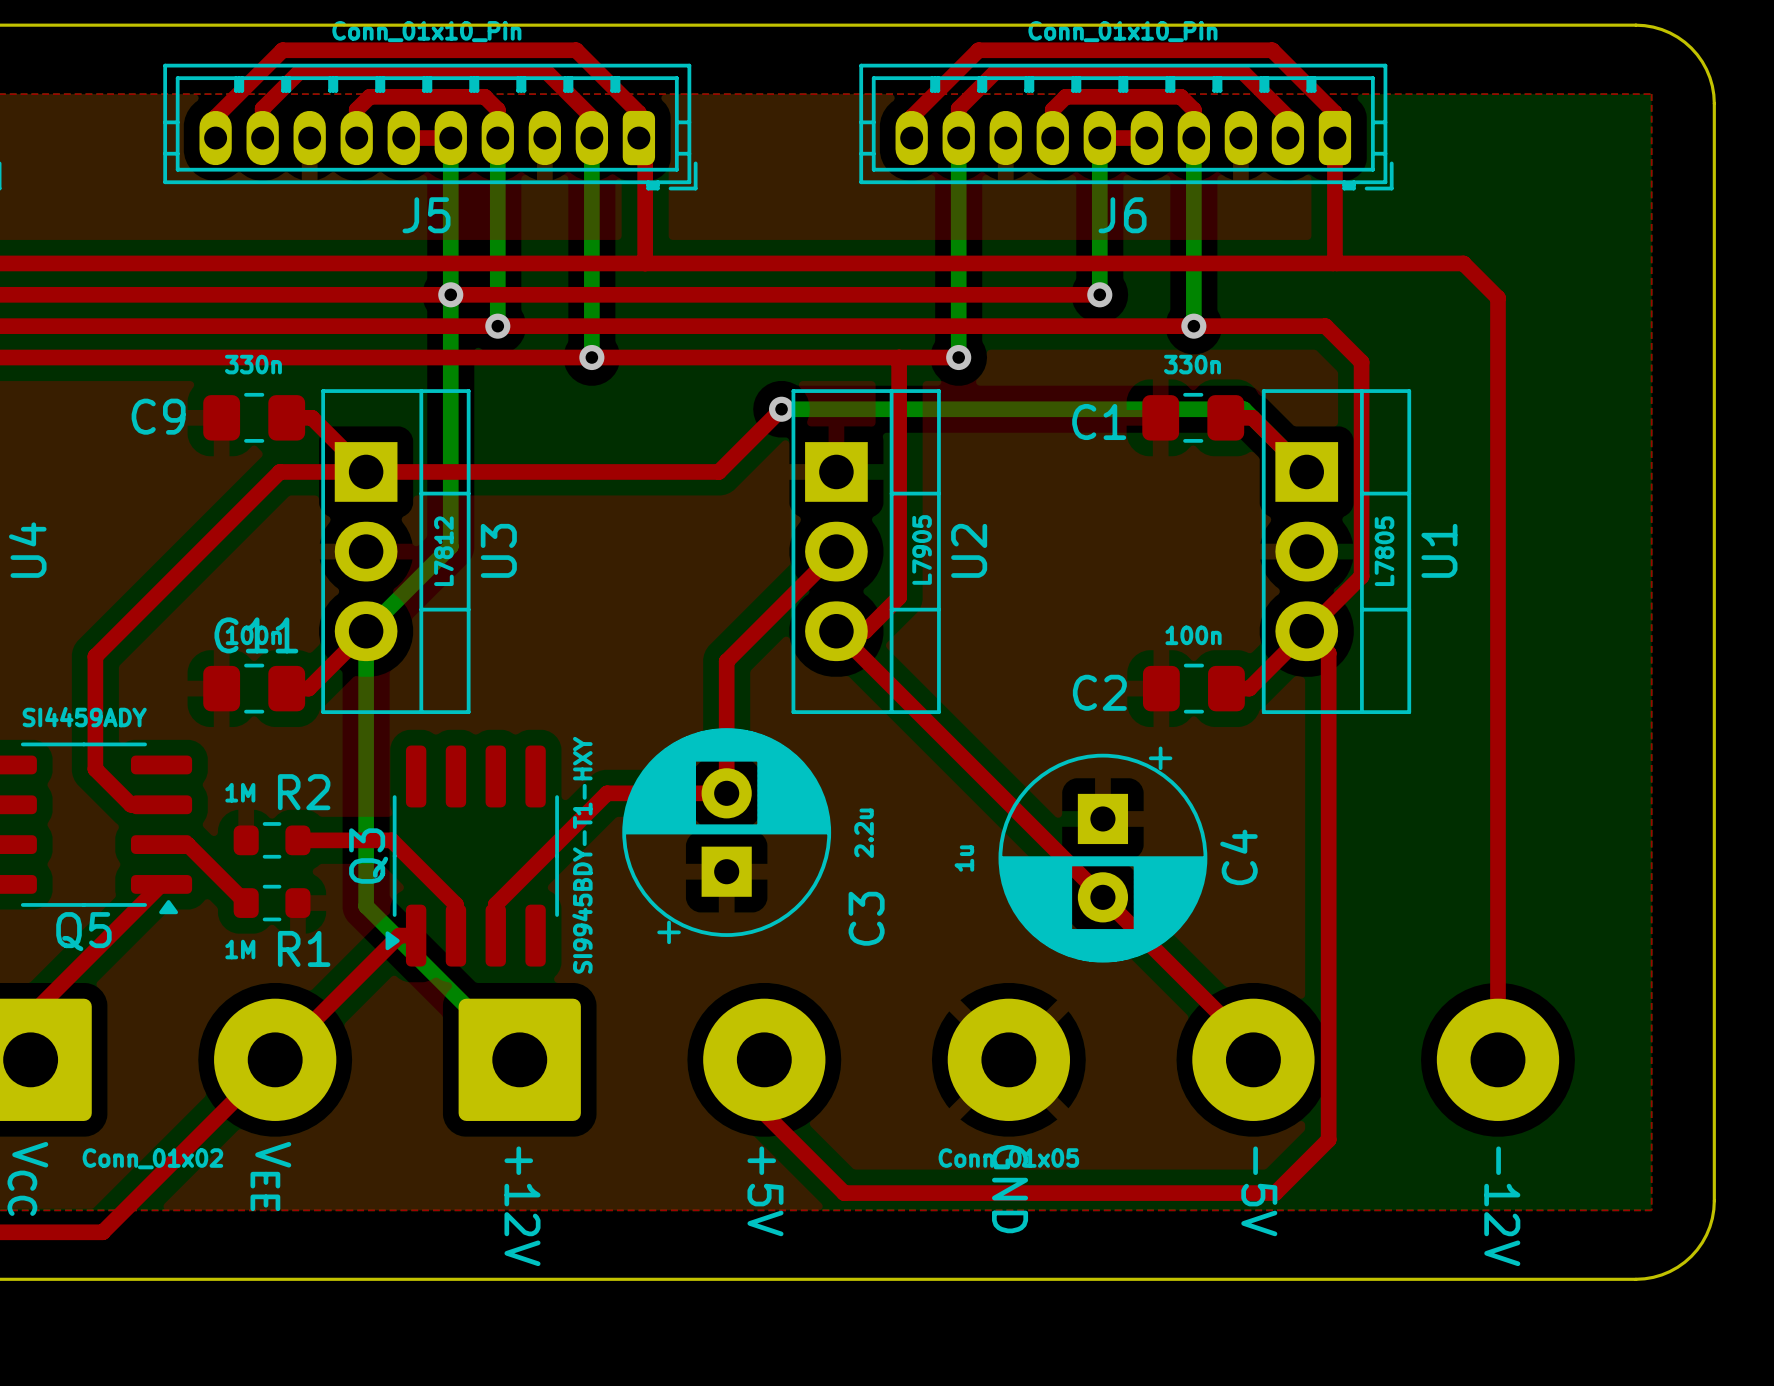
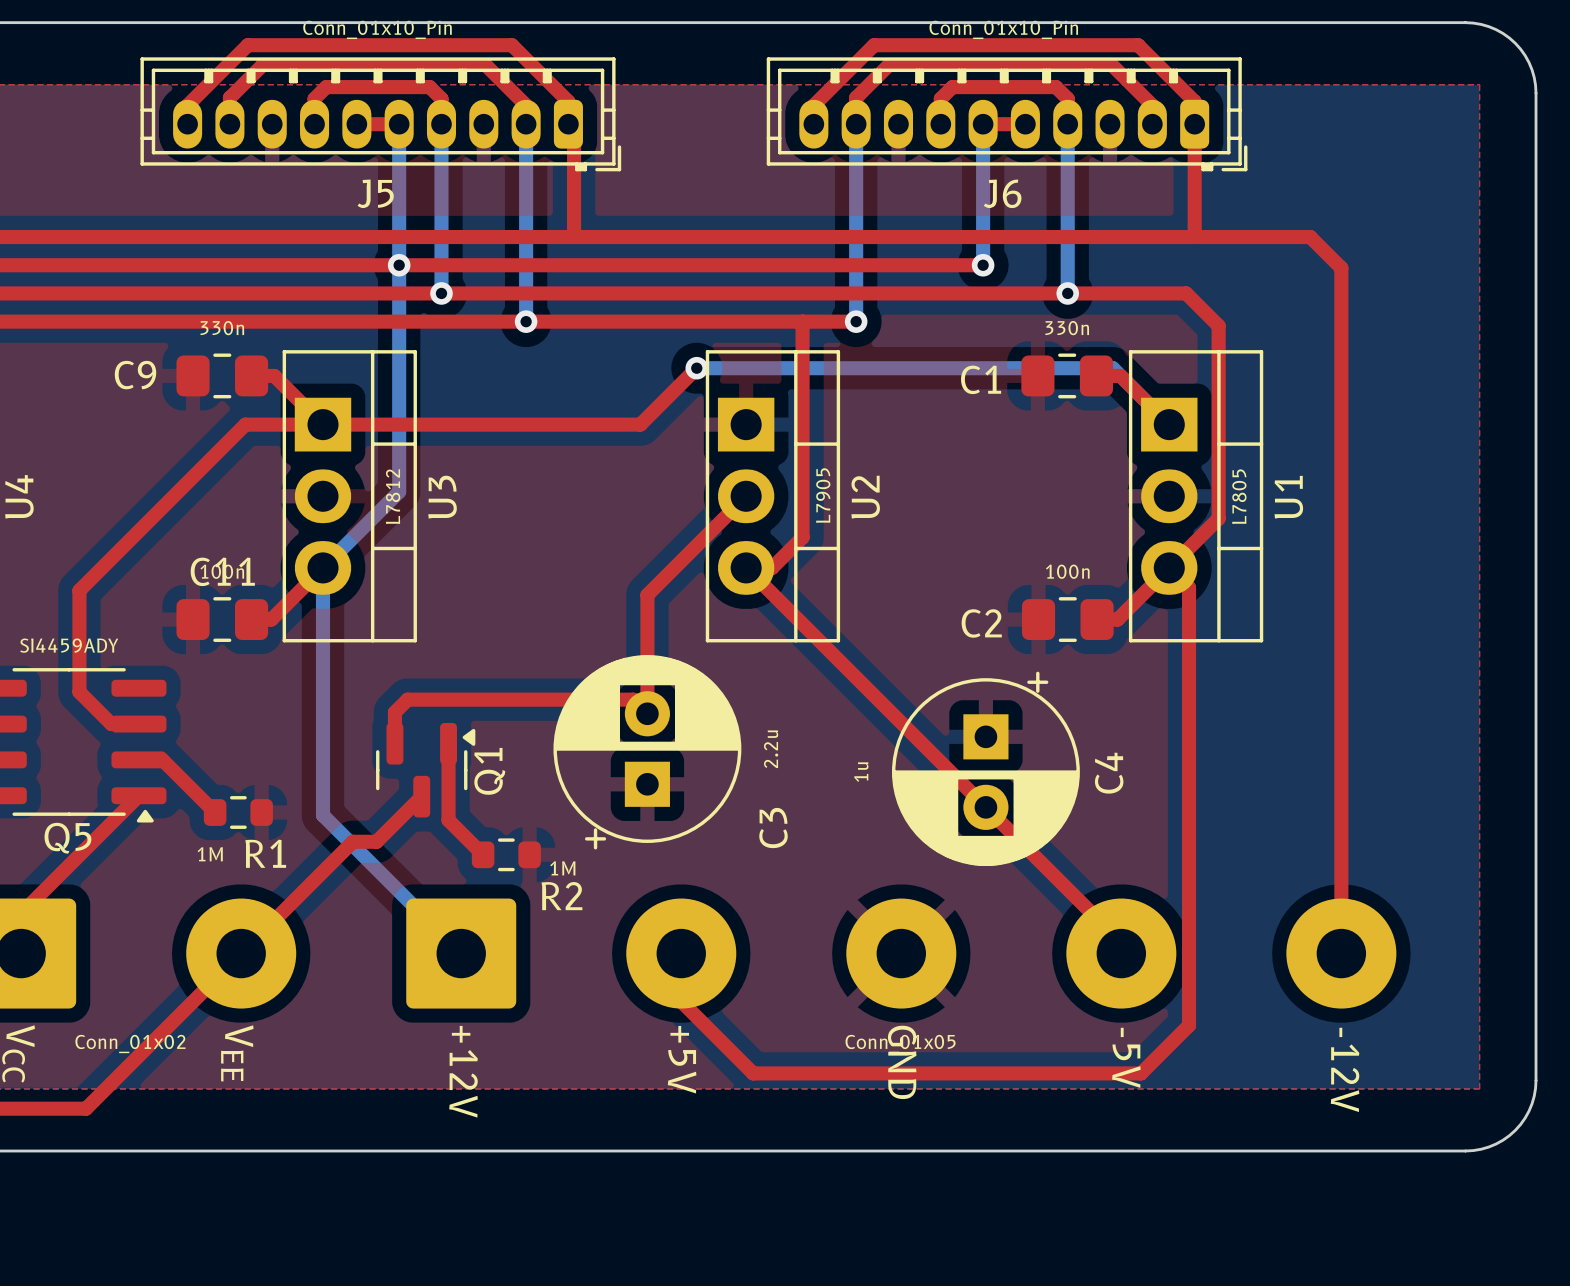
R2 value position: 1M (240, 792) -> 1M (562, 868)
R2 name position: R2 (304, 792) -> R2 (561, 896)
top track: (726, 793) (607, 793) (495, 904) (495, 935) -> (647, 713) (633, 699) (407, 699) (394, 712) (394, 743)
top track: none -> (448, 743) (448, 820) (483, 854)
R2 position: (272, 840) -> (506, 854)
top track: (297, 840) (391, 840) (455, 904) (455, 935) -> none
Q3: SI9945BDY-T1-HXY (472, 856) -> none
Q1: none -> (425, 770)
top track: none -> (421, 796) (376, 841) (368, 841)

